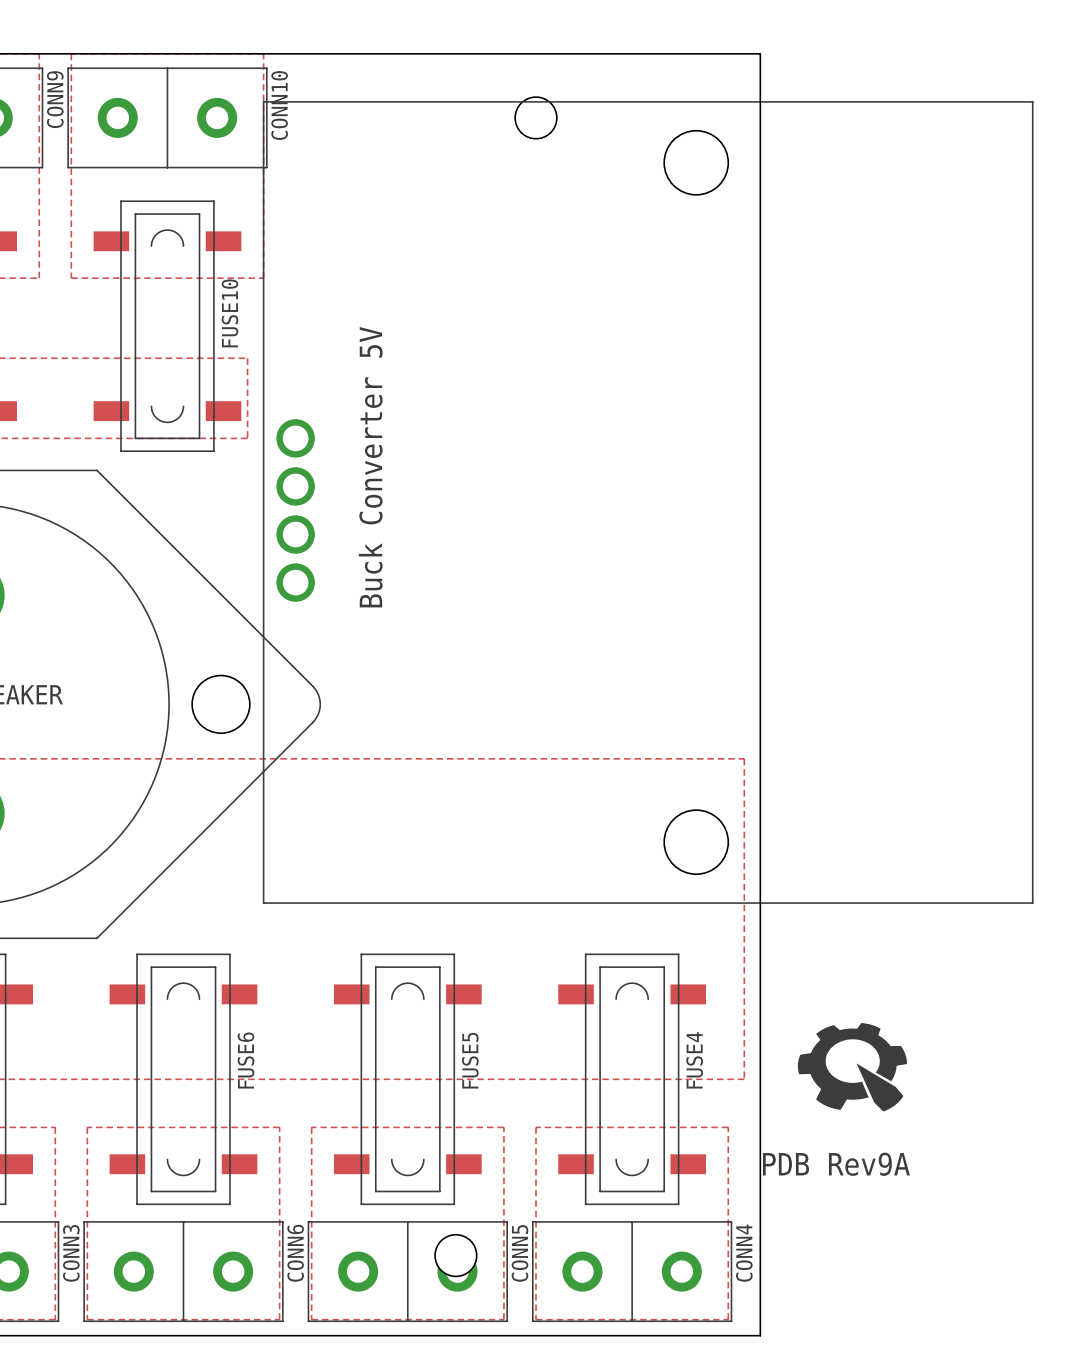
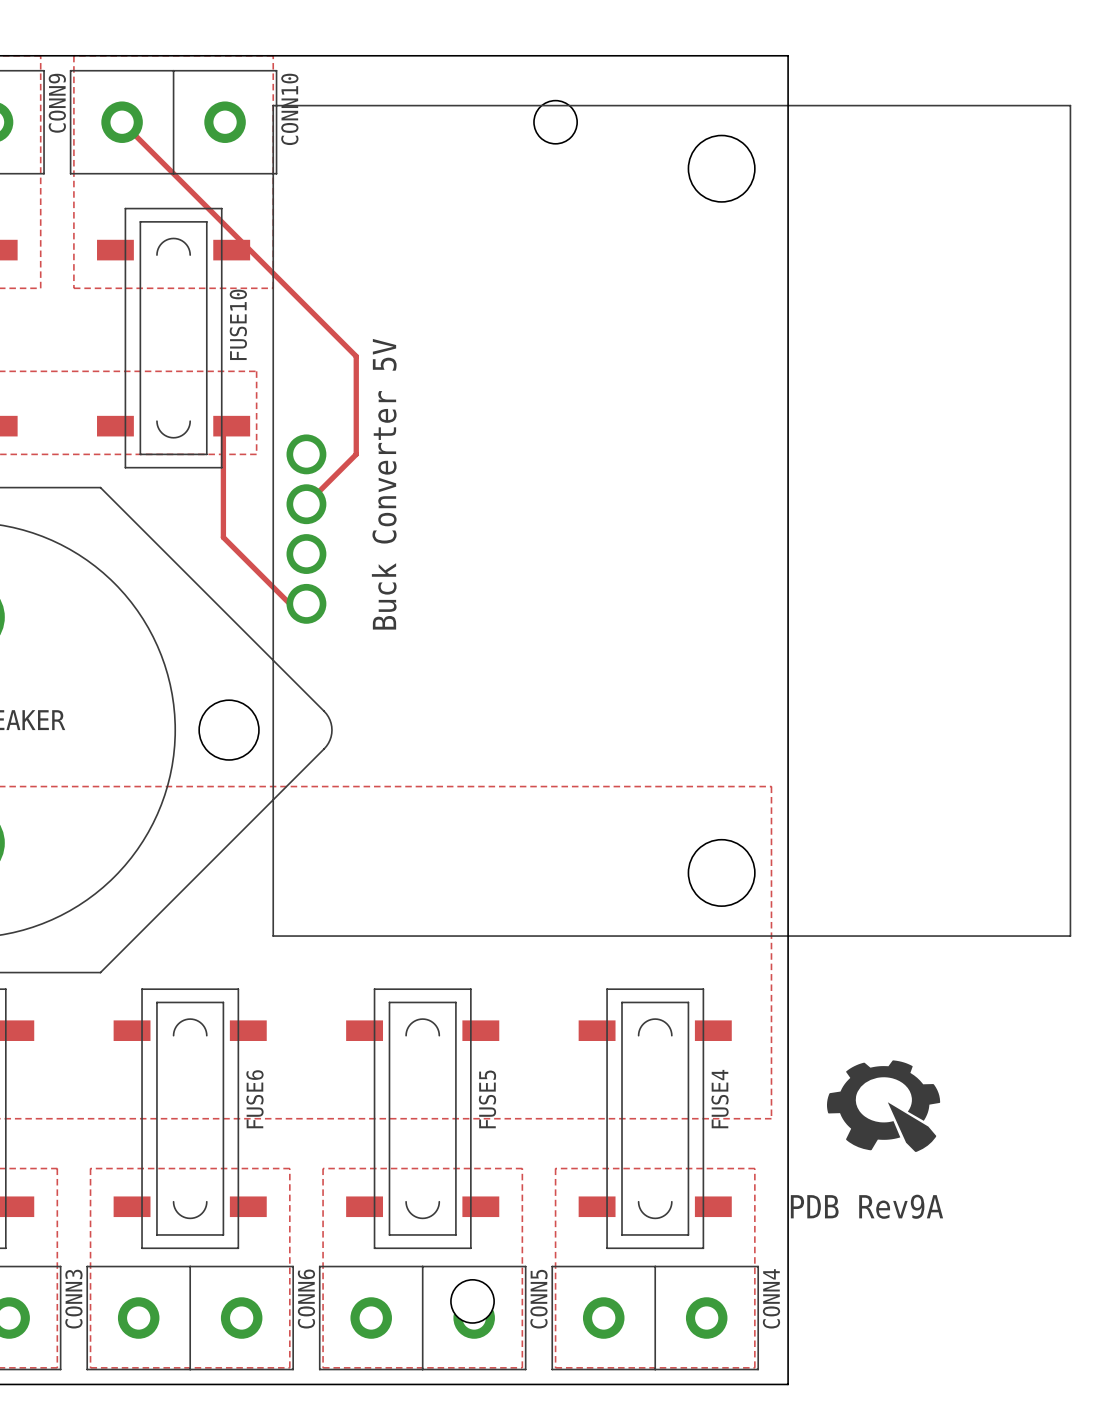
track: none -> (122, 122) (356, 356) (356, 454) (306, 504)
track: none -> (231, 426) (223, 434) (223, 537) (289, 603) (306, 603)

